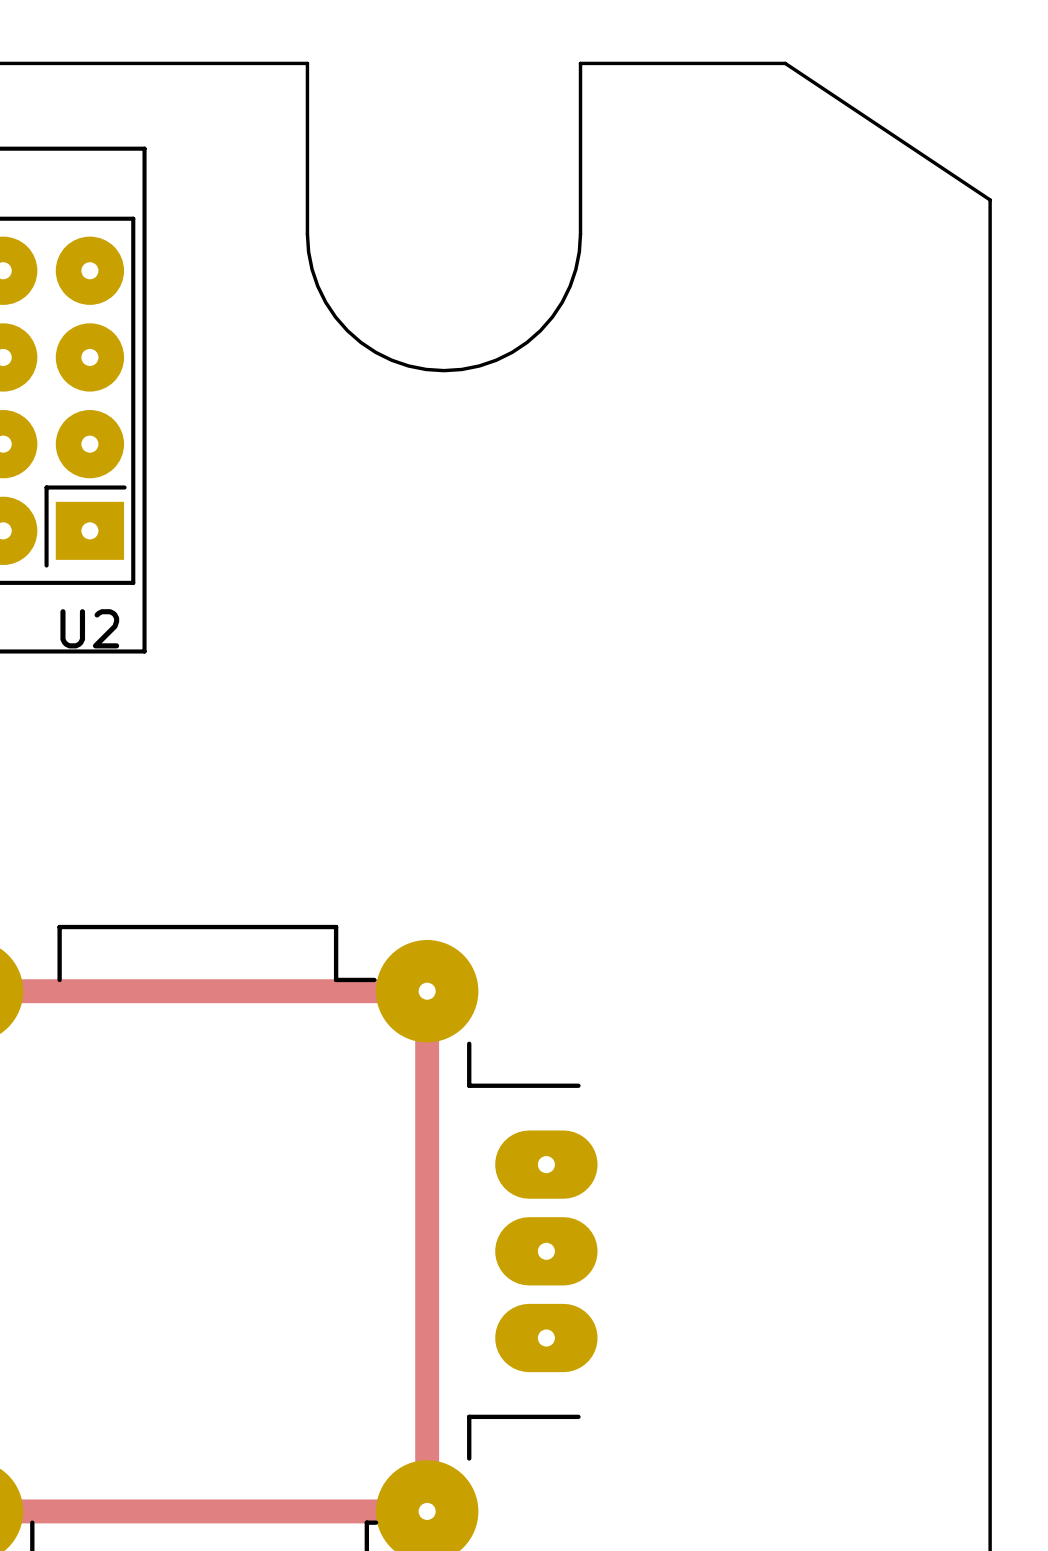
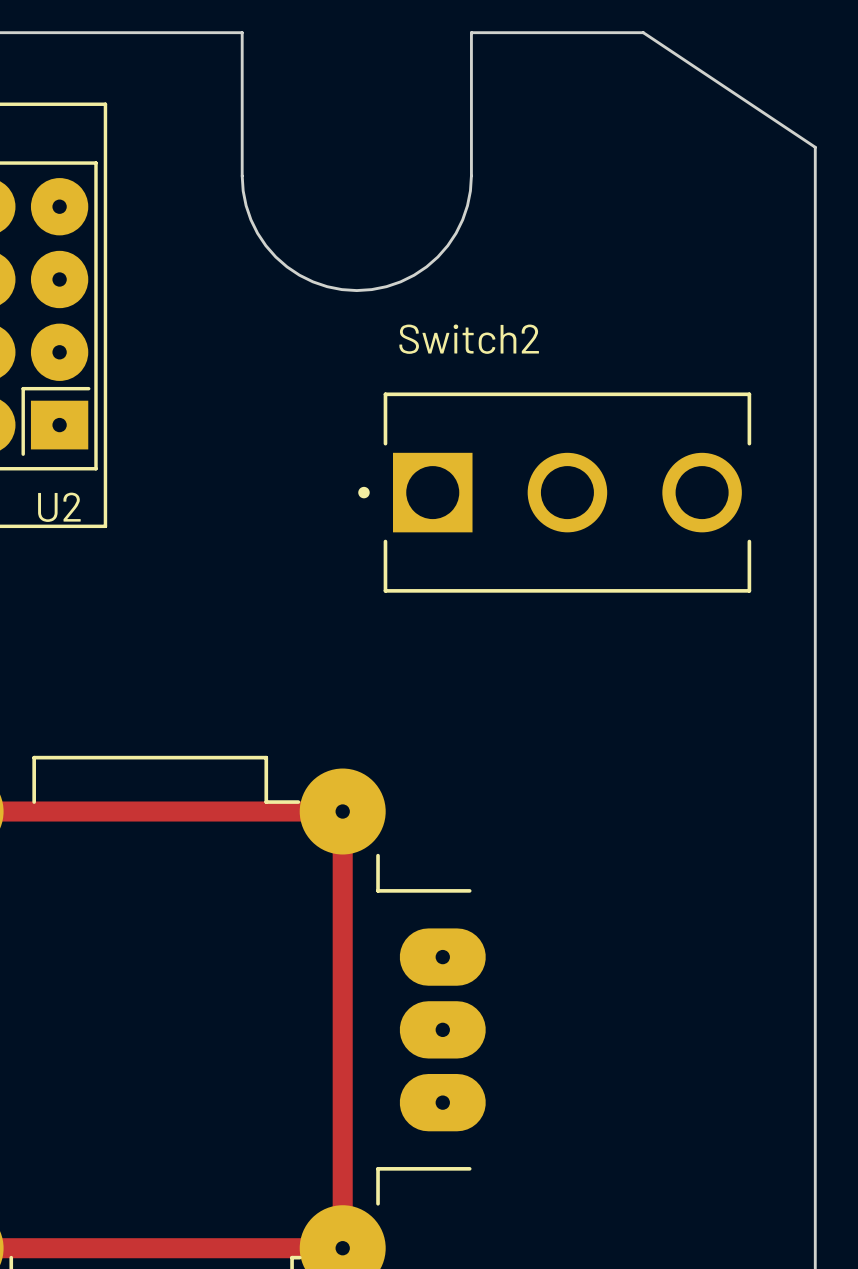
Switch2: none -> (554, 492)

